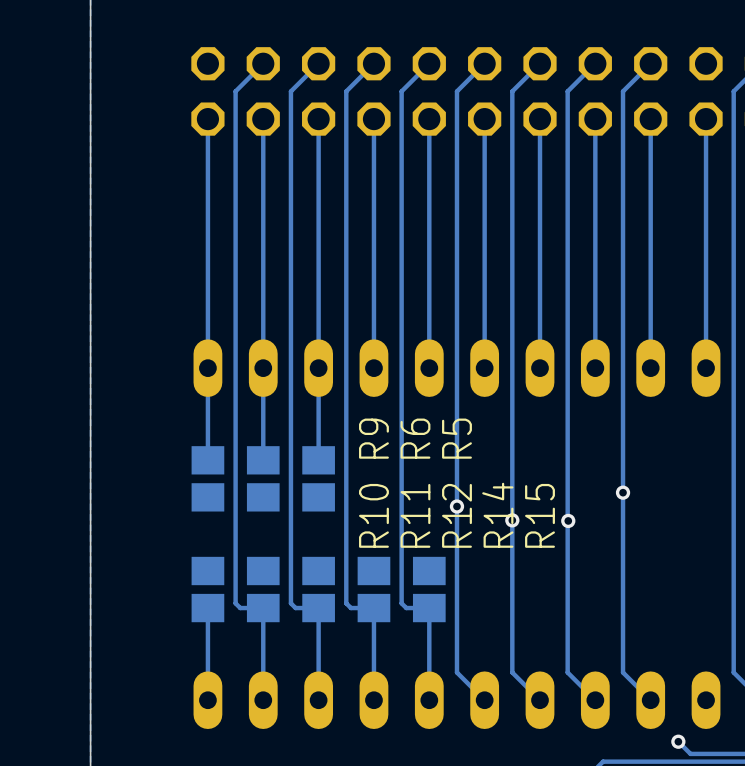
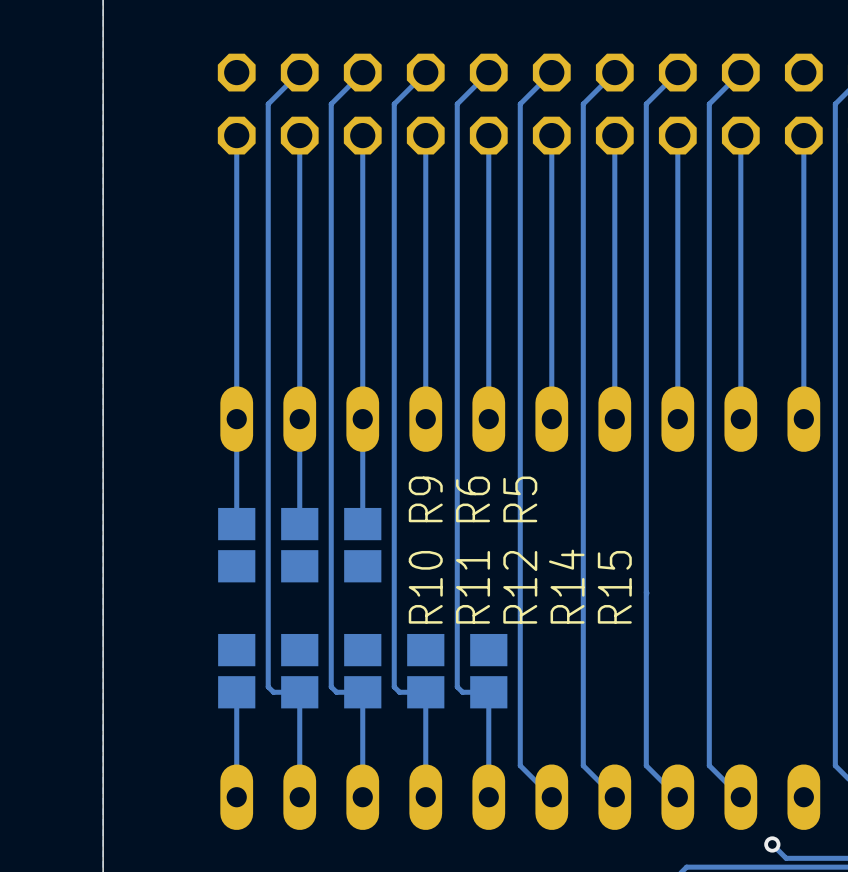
via: (623, 492) -> none
via: (456, 506) -> none
via: (512, 520) -> none
via: (568, 520) -> none

